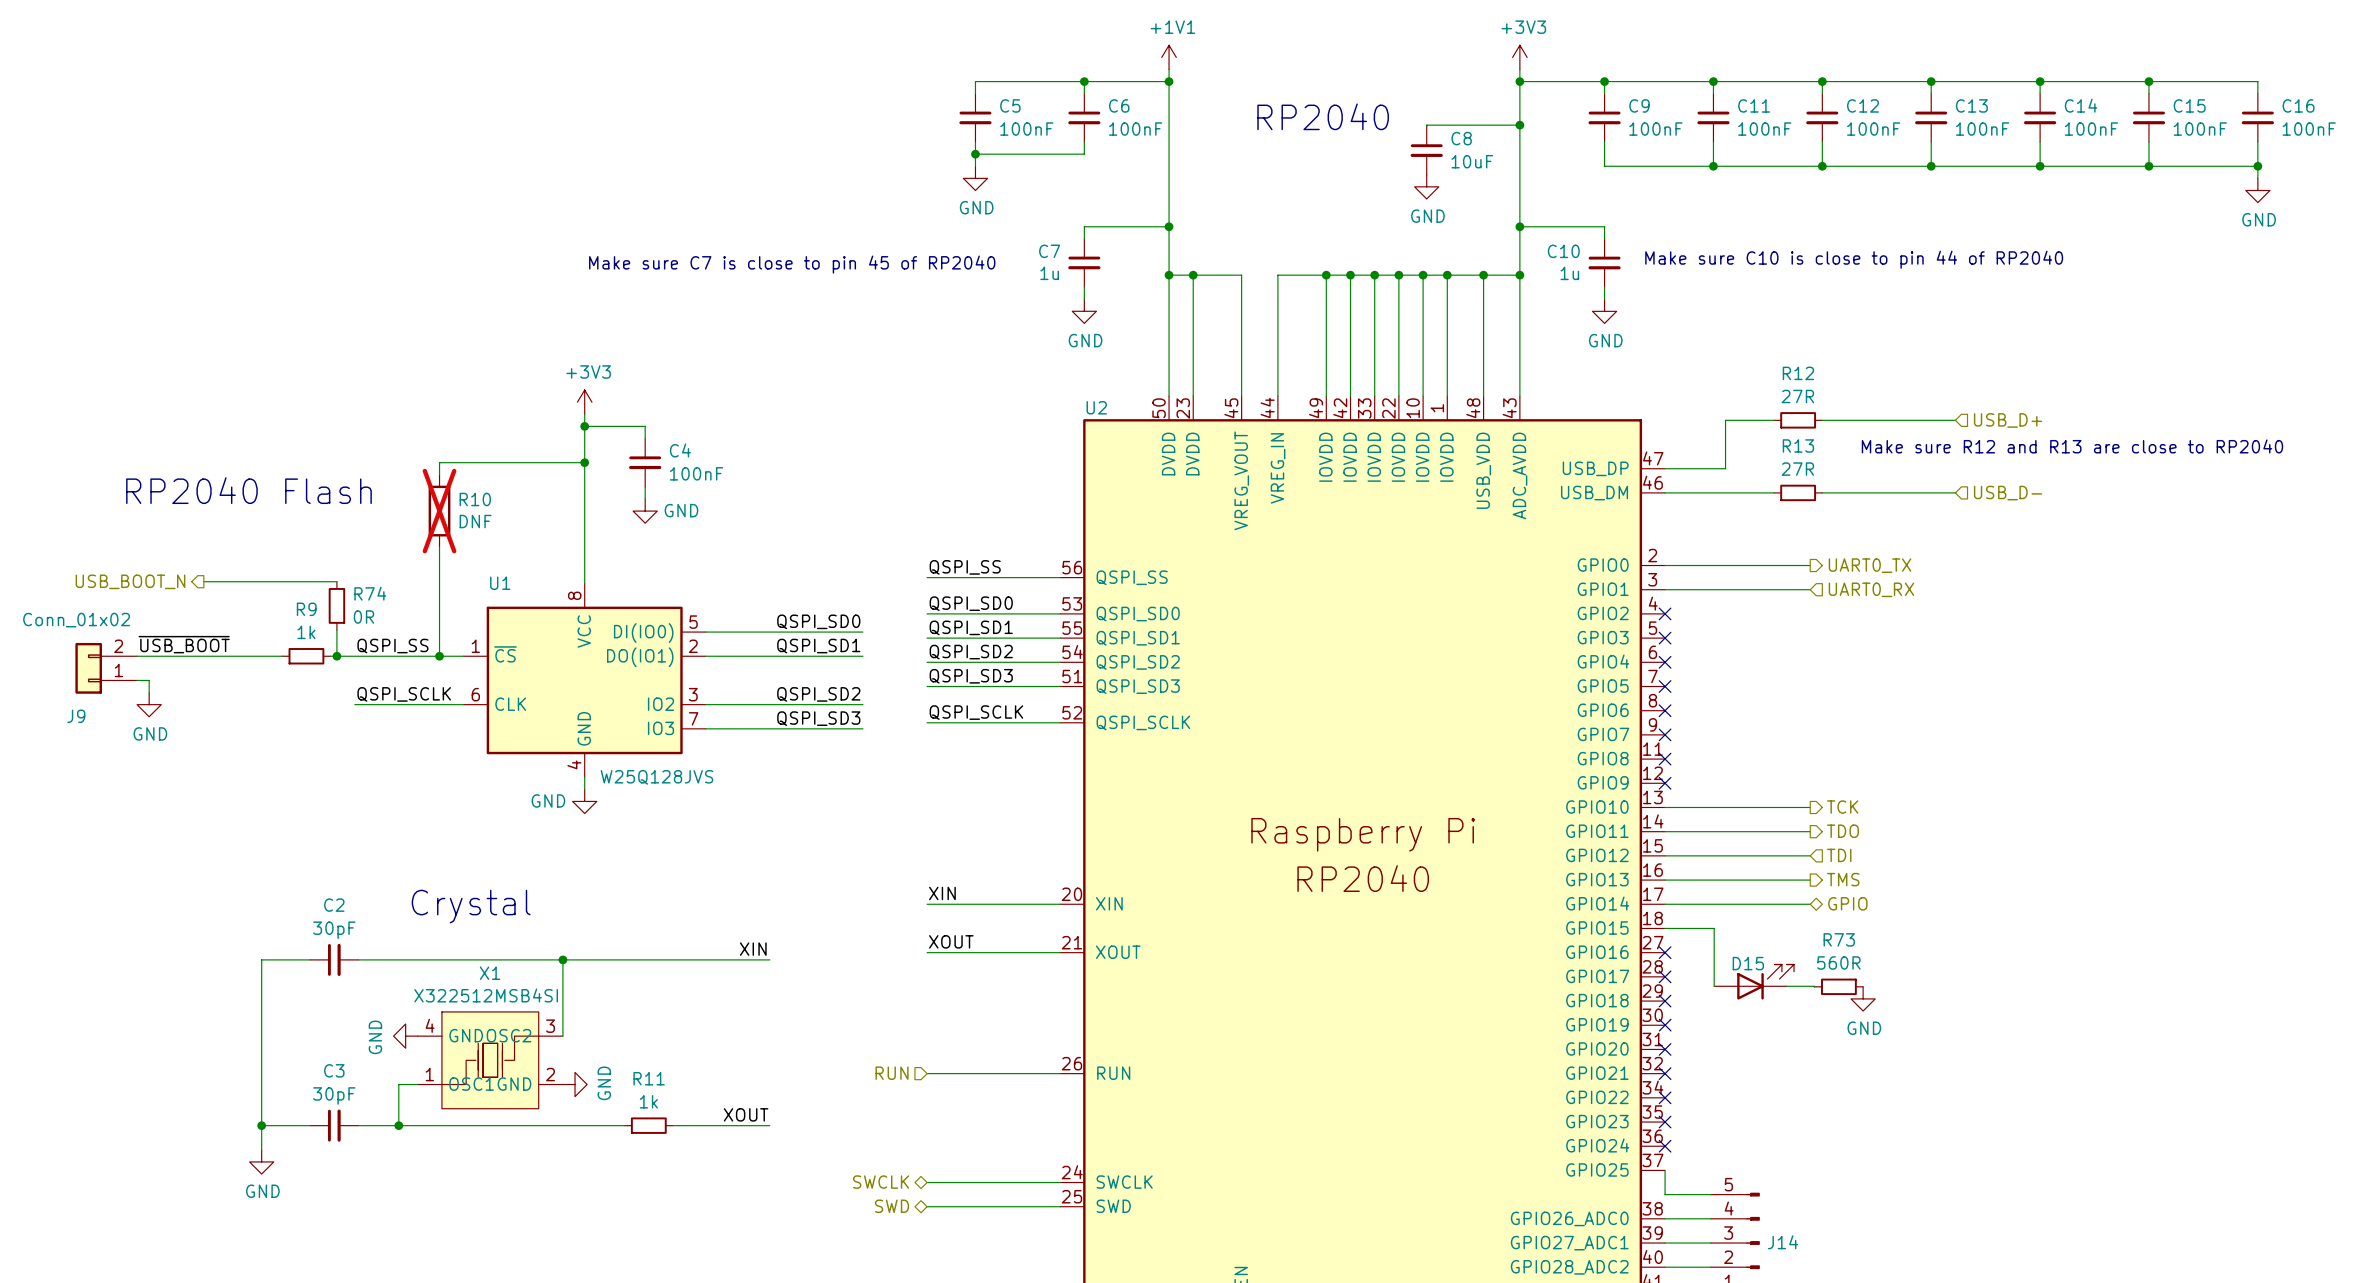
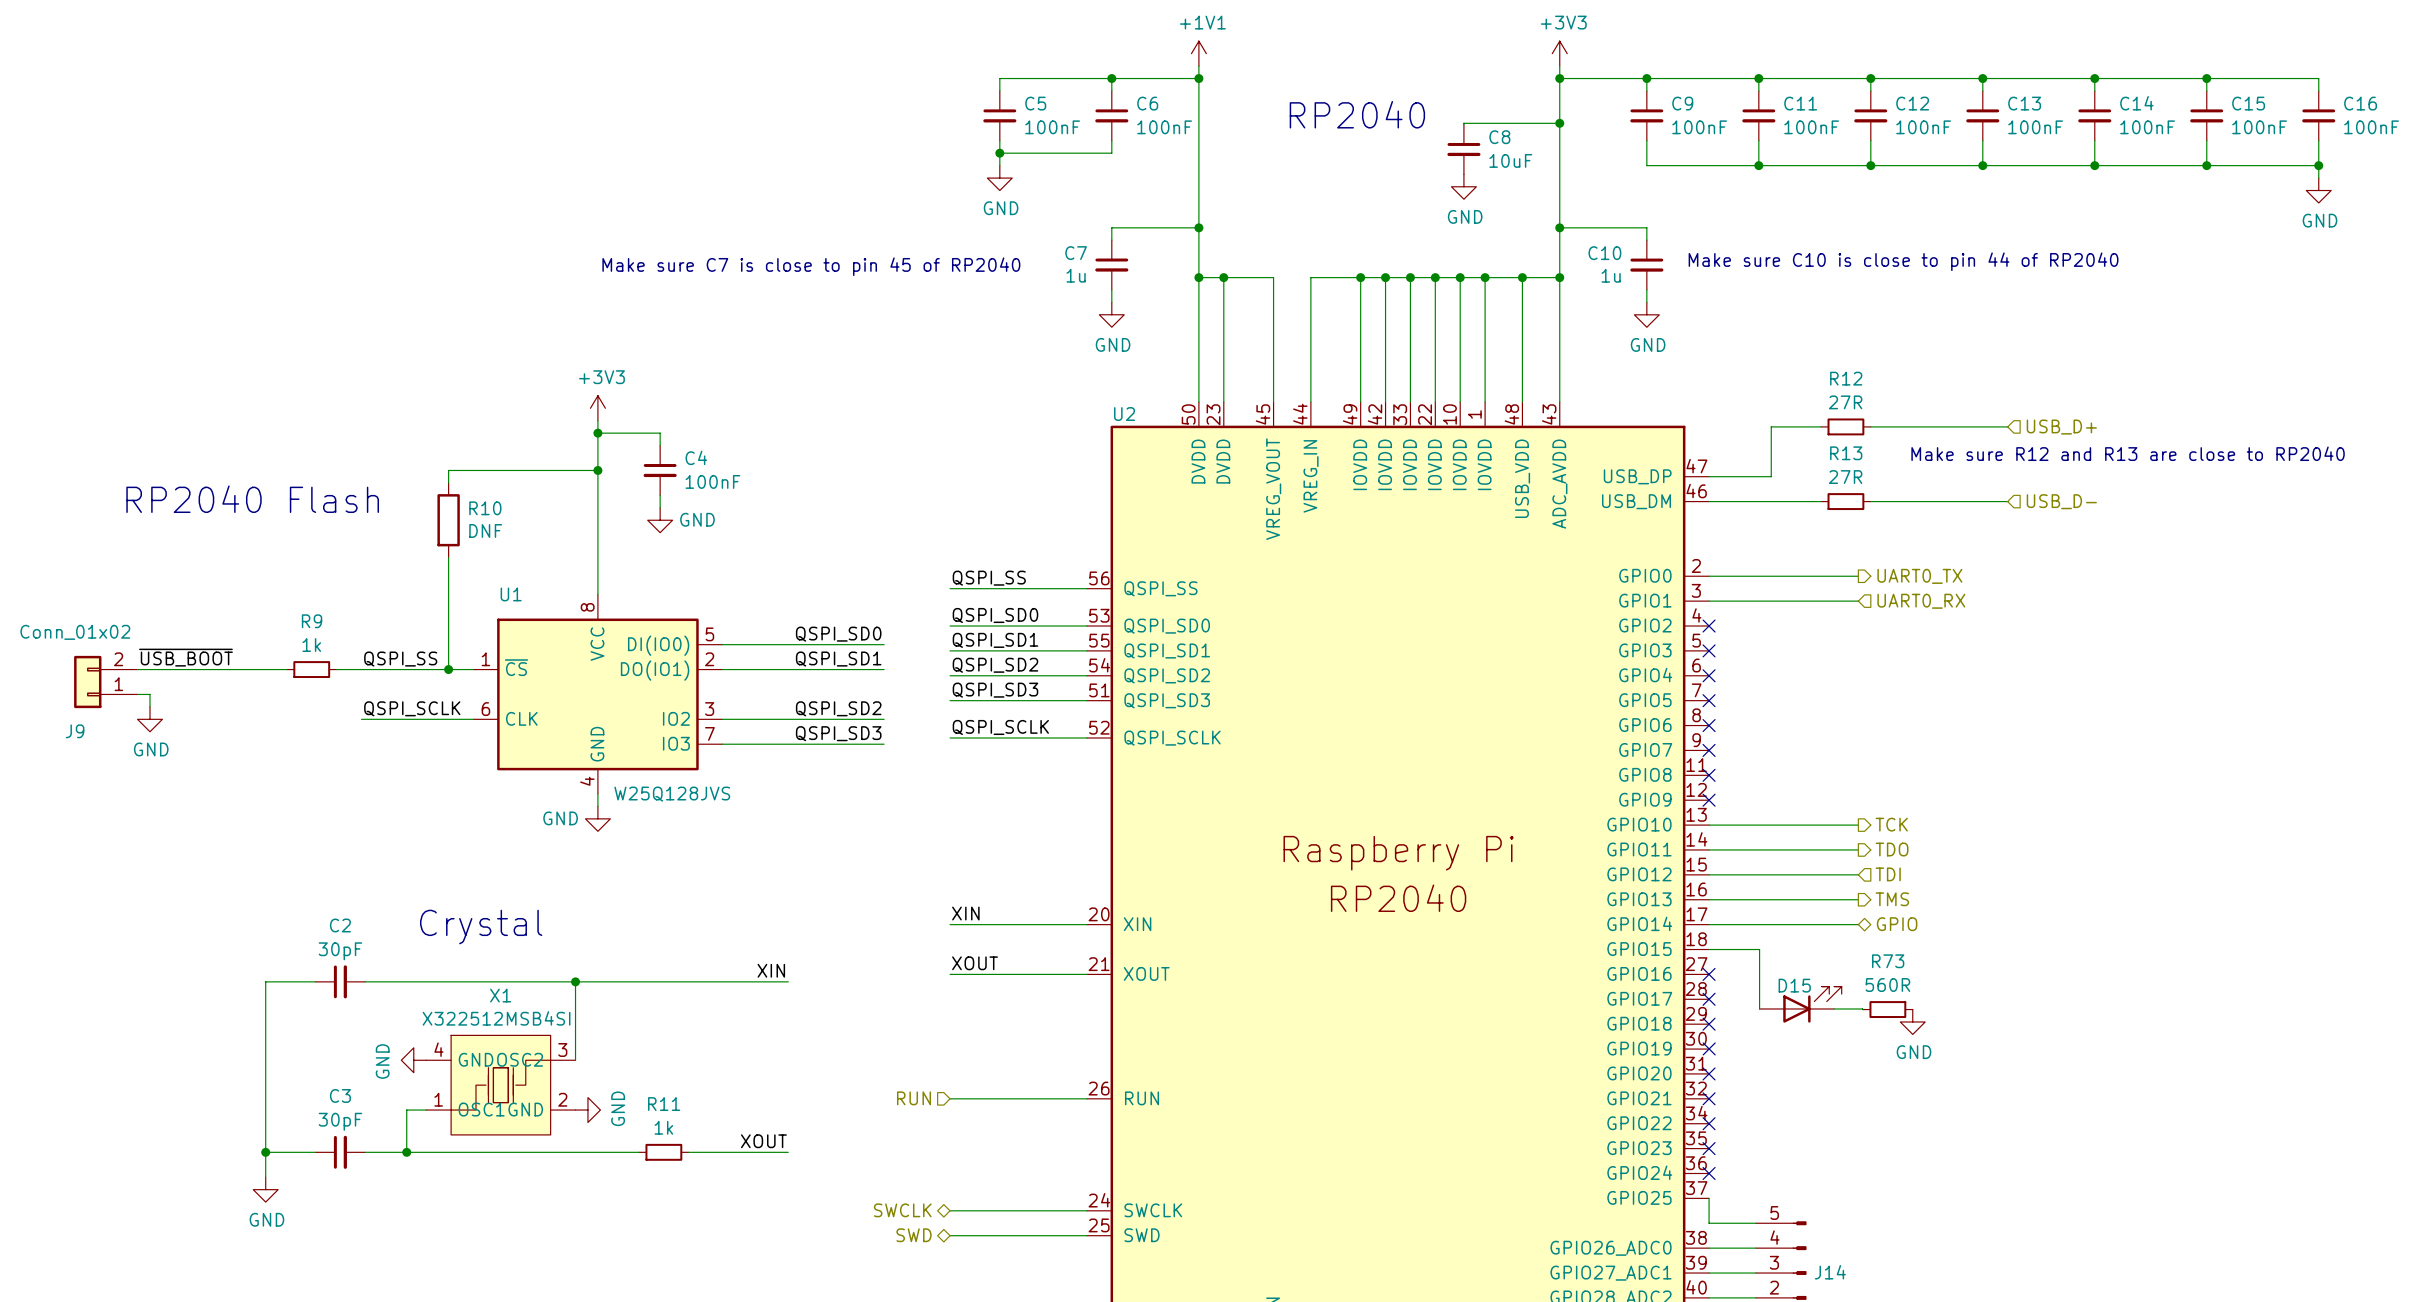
R10 do-not-place cross: (439, 511) -> none
hierarchical label: USB_BOOT_N (130, 581) -> none
wire: (203, 581) (336, 581) -> none
R74: 0R (336, 605) -> none
wire: (336, 630) (336, 656) -> none
junction: (336, 656) -> none

